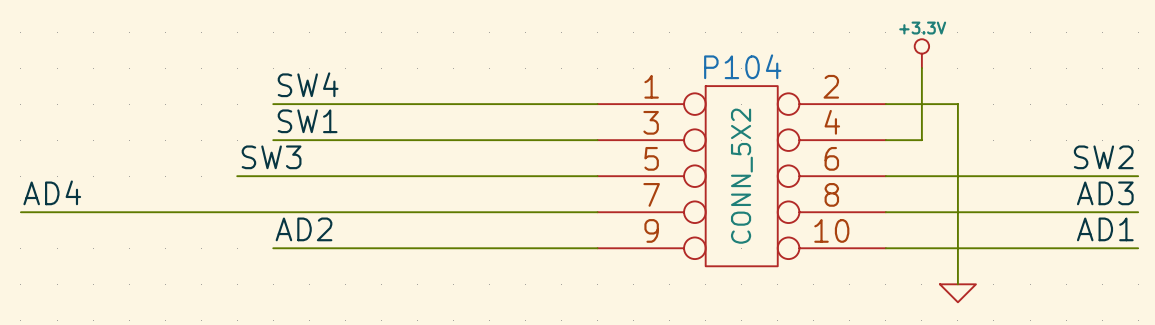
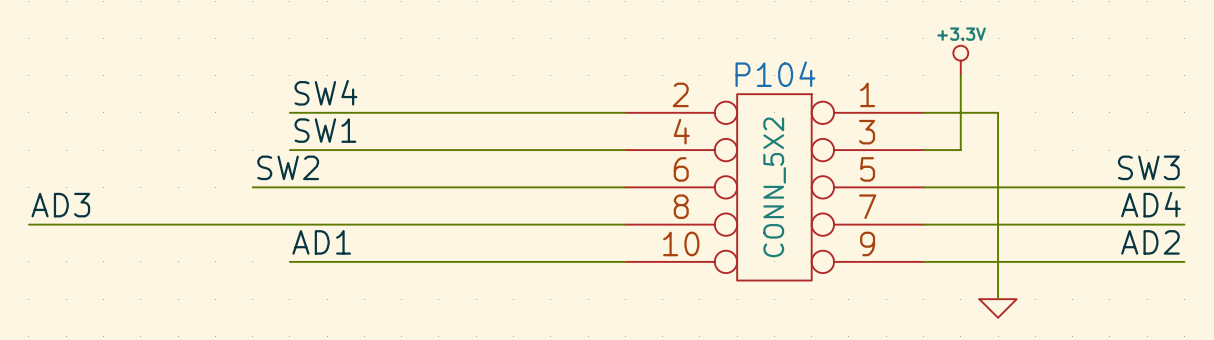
label: SW3 (271, 157) -> SW2 (288, 167)
label: SW2 (1103, 157) -> SW3 (1148, 167)
P104 flip: as is (741, 176) -> left-right (774, 187)
label: AD4 (52, 192) -> AD3 (60, 205)
label: AD3 (1105, 193) -> AD4 (1150, 204)
label: AD2 (304, 229) -> AD1 (321, 242)
label: AD1 (1105, 229) -> AD2 (1150, 242)

